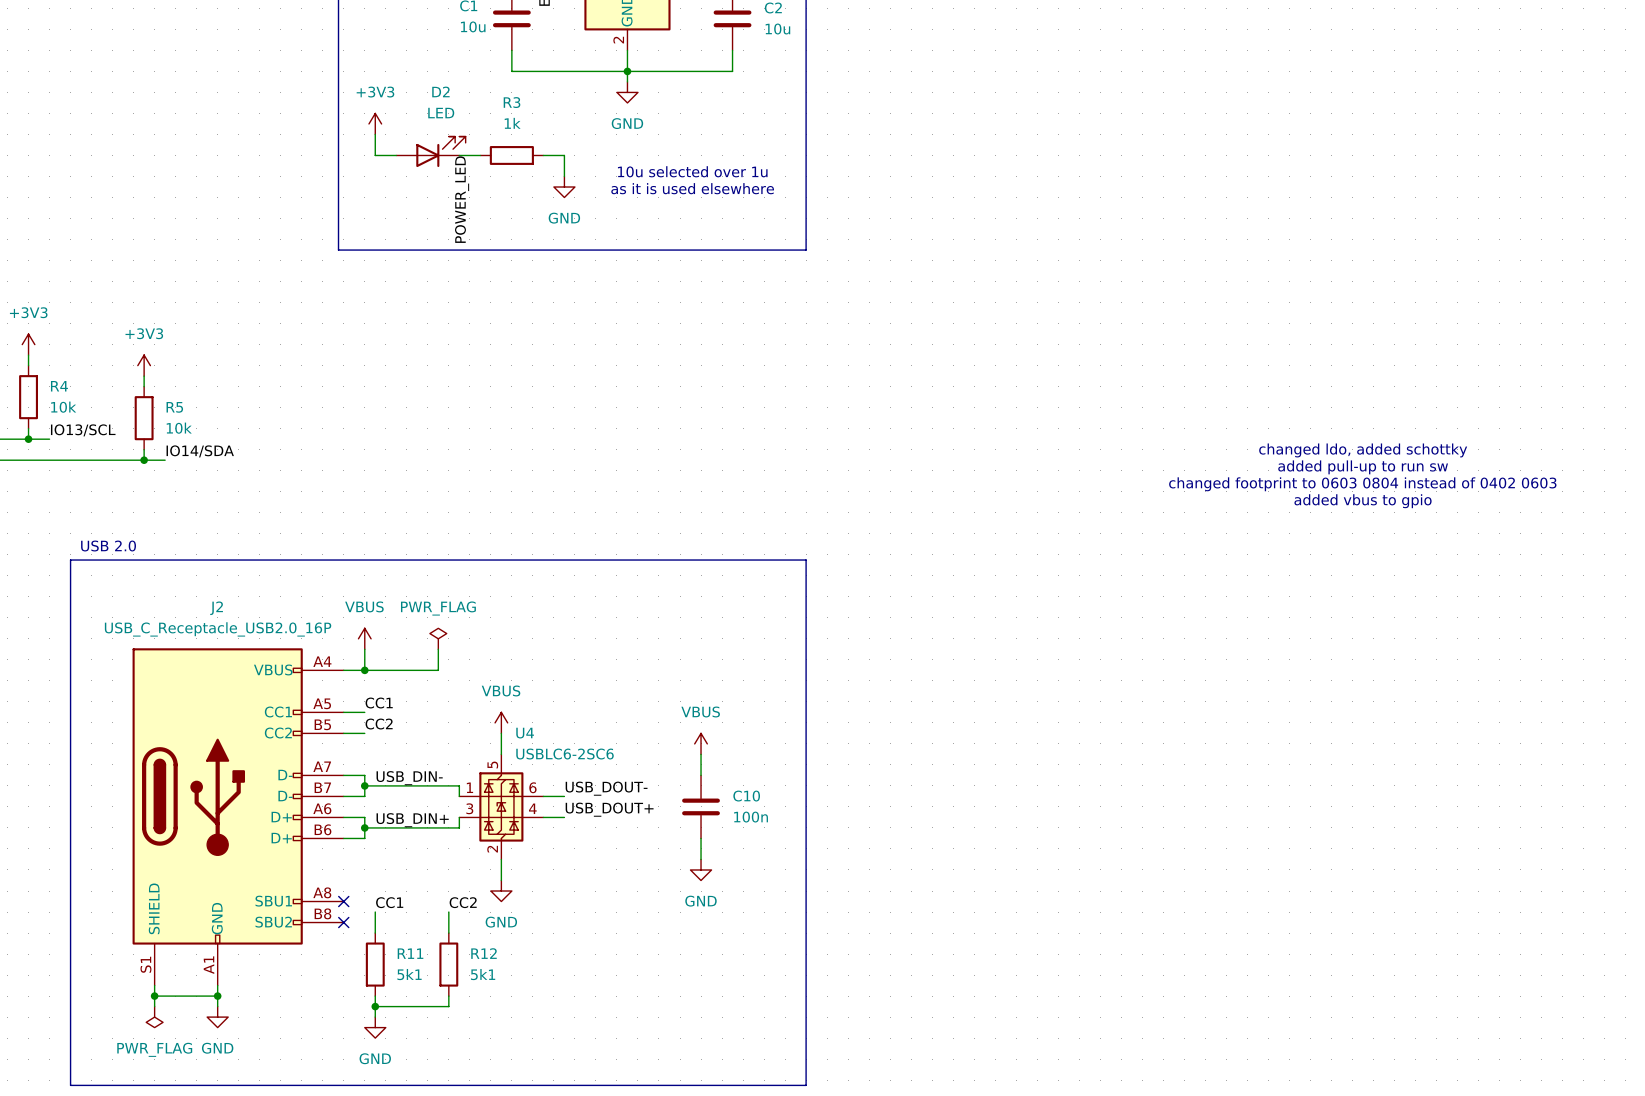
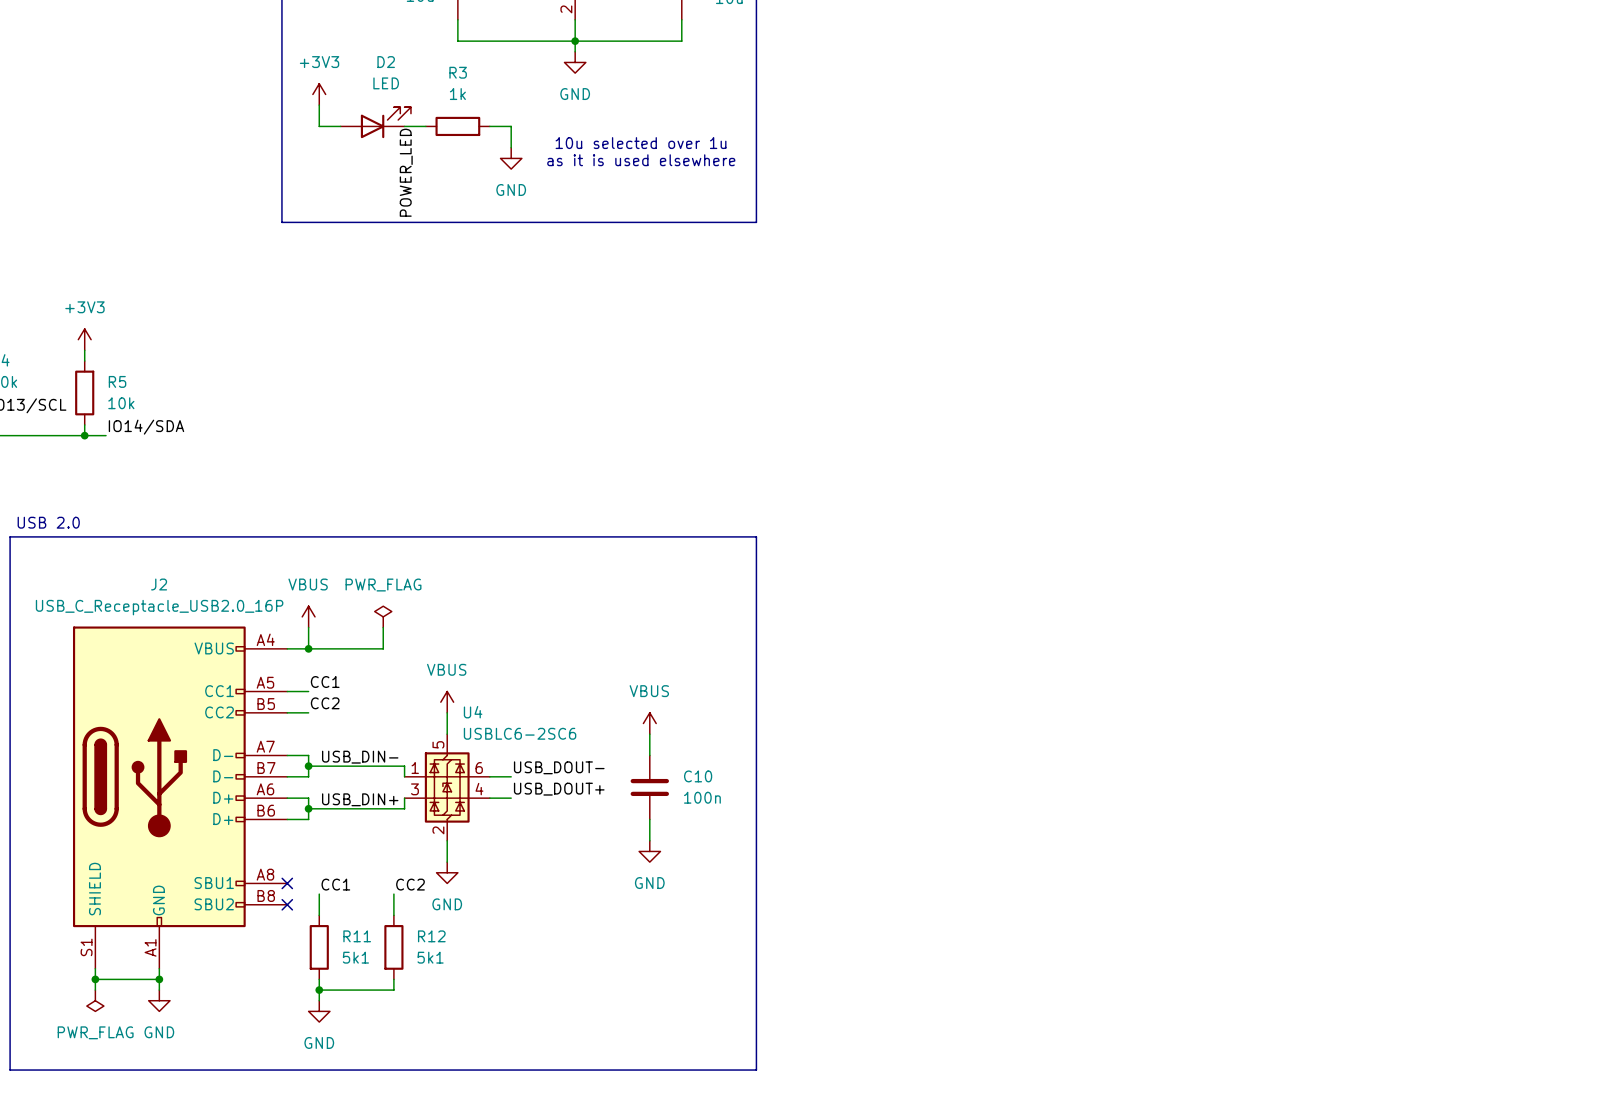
text: changed ldo, added schottky (1363, 450) -> none
text: added pull-up to run sw (1363, 467) -> none
text: changed footprint to 0603 0804 instead of 0402 0603 (1362, 484) -> none
text: added vbus to gpio (1363, 501) -> none

